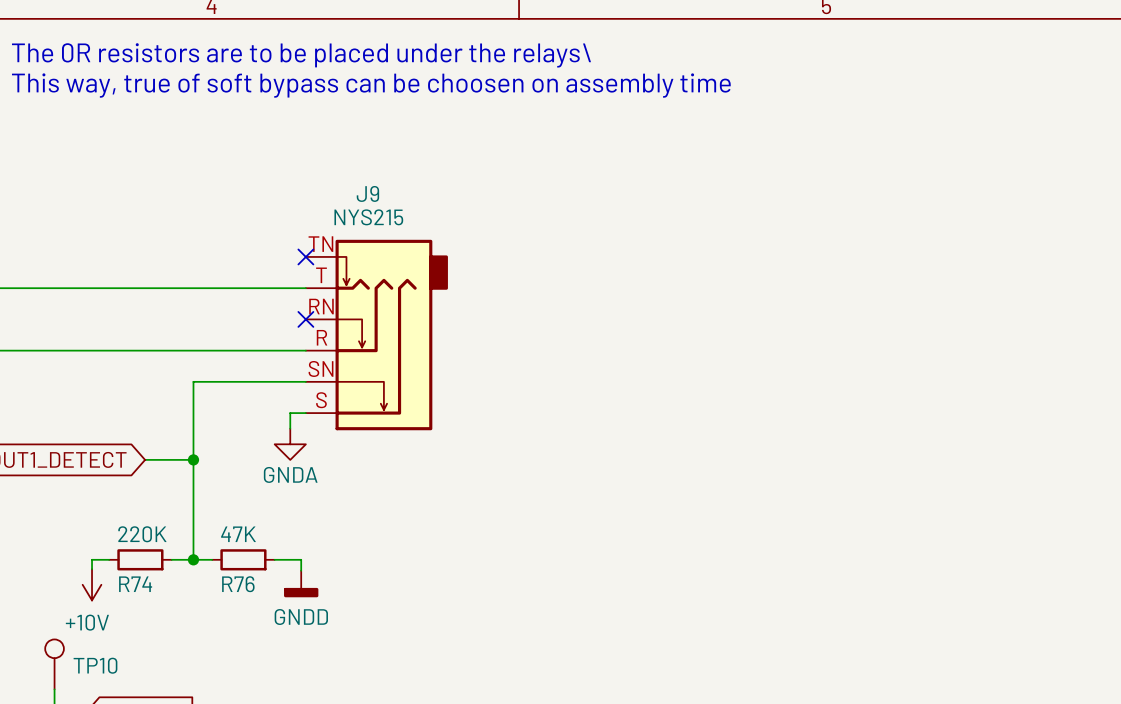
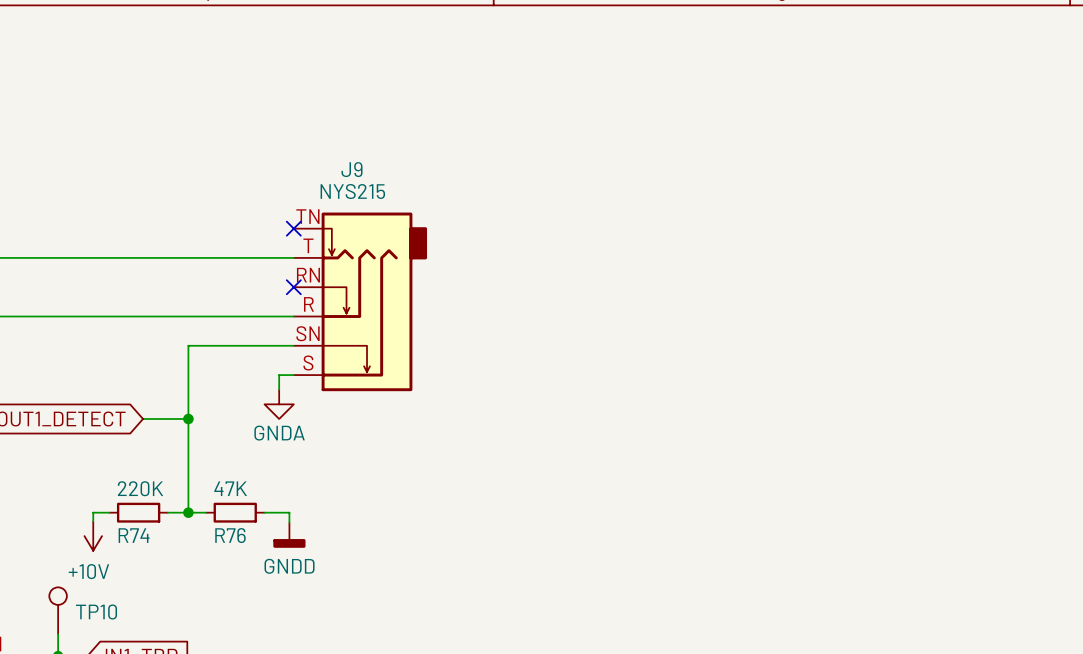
text: The 0R resistors are to be placed under the relays\ (301, 55) -> none
text: This way, true of soft bypass can be choosen on assembly time (371, 85) -> none

